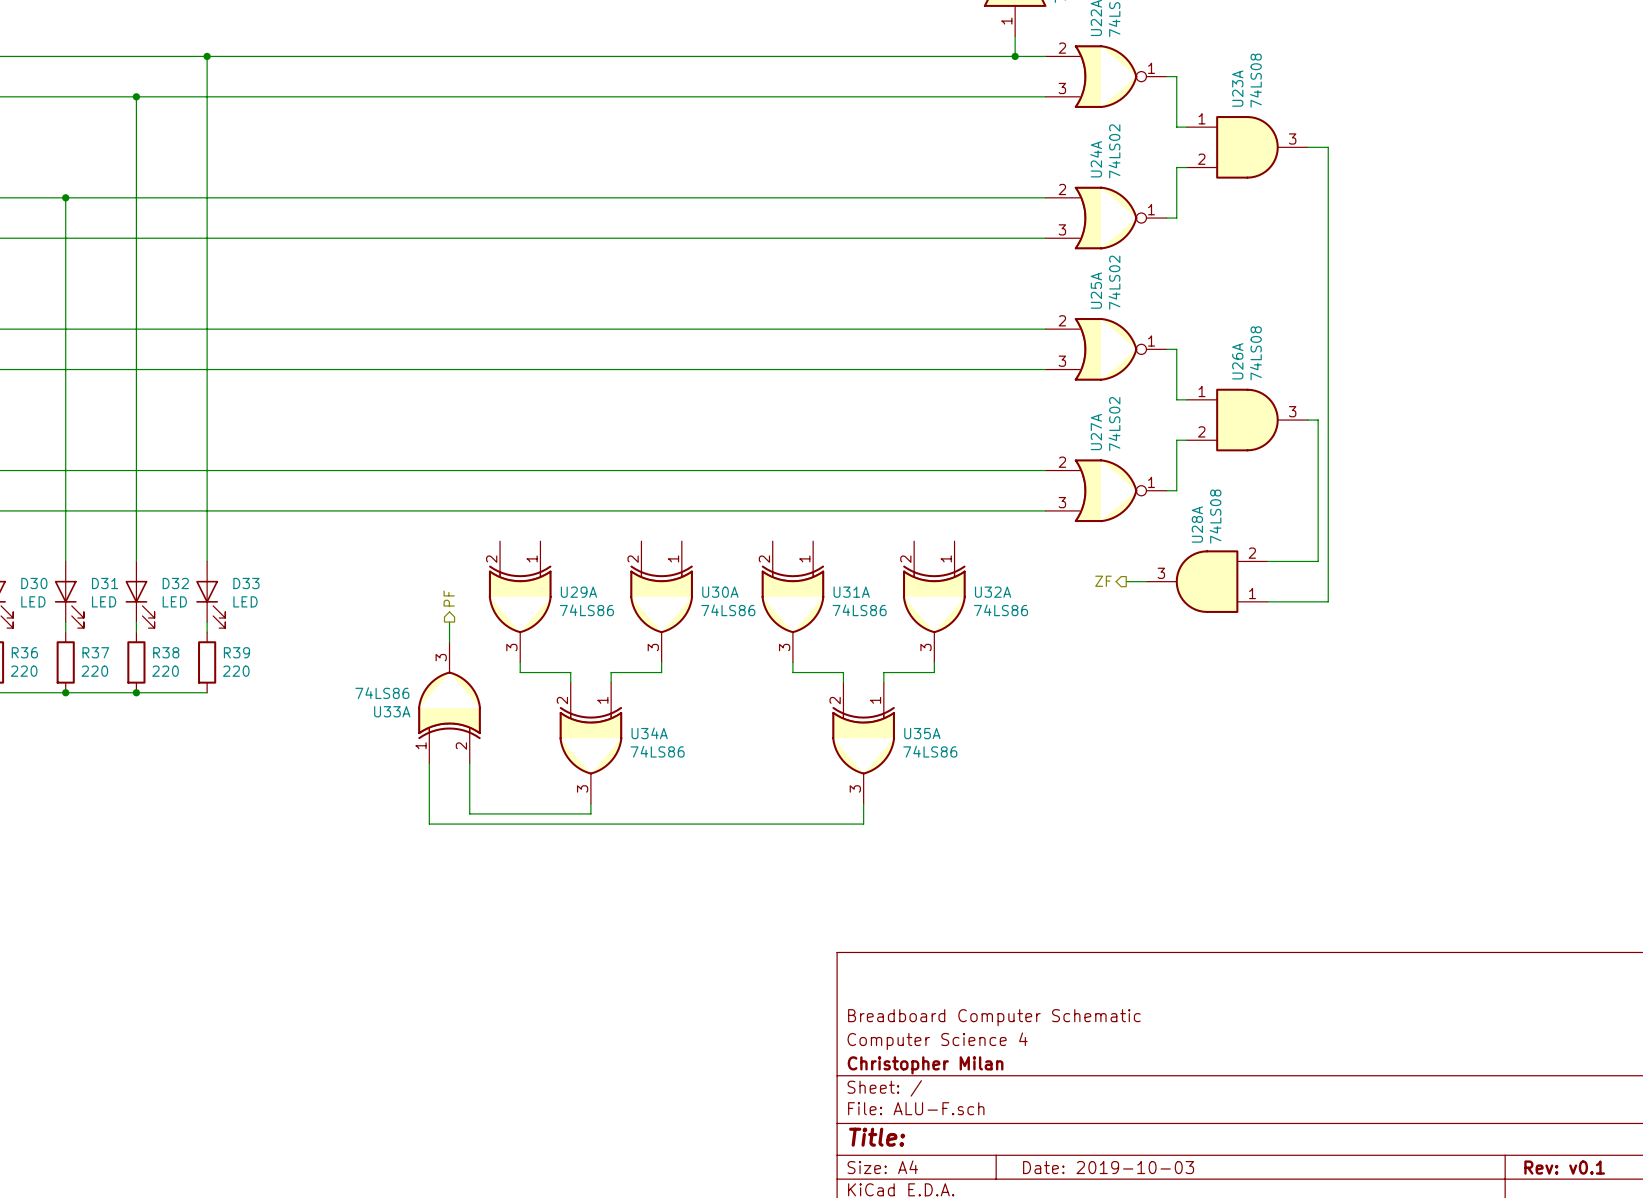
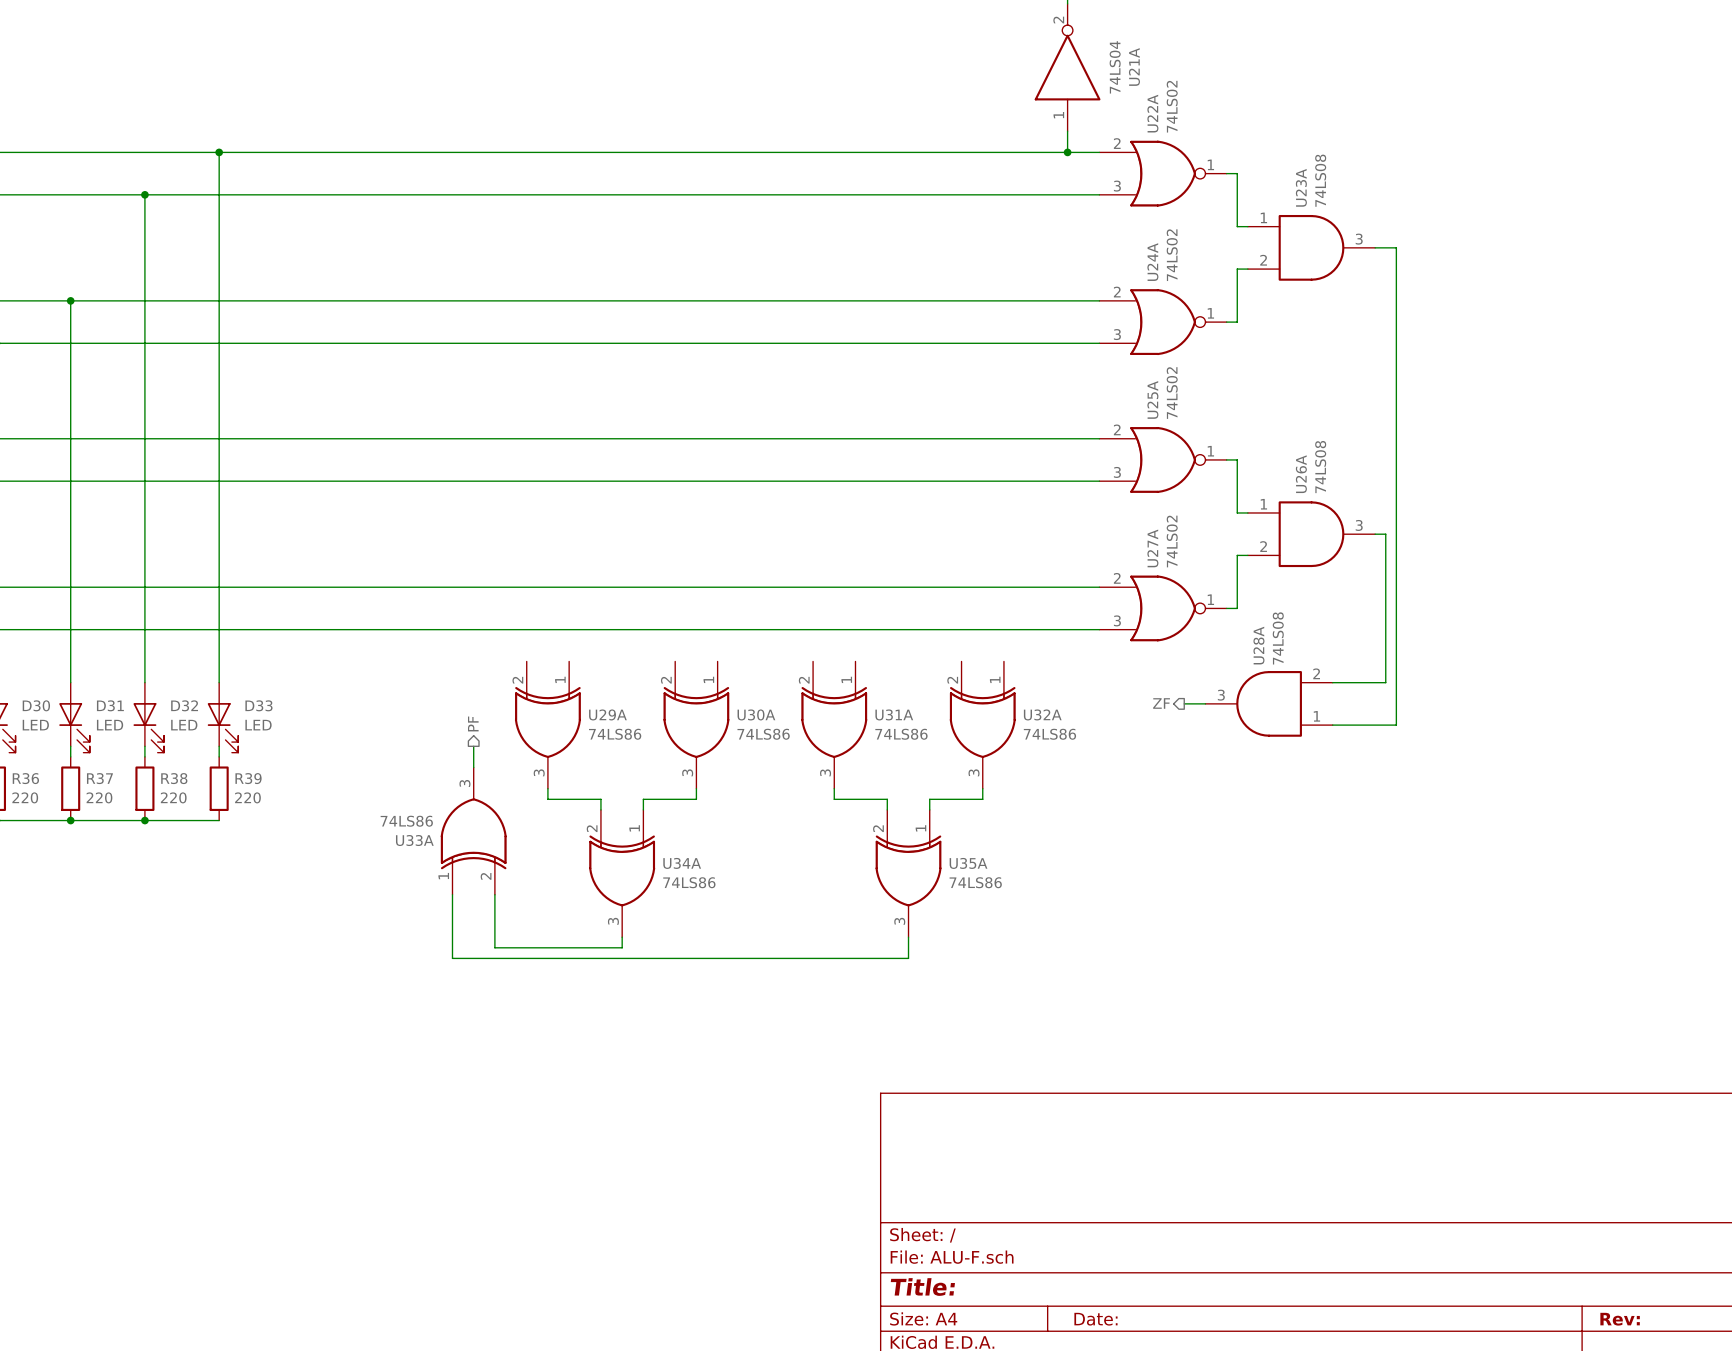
title block: Breadboard Computer Schematic (994, 1017) -> none
title block: Computer Science 4 (937, 1041) -> none
title block: Christopher Milan (925, 1065) -> none
title block: Date: 2019-10-03 (1108, 1167) -> Date: (1095, 1319)
title block: Rev: v0.1 (1564, 1167) -> Rev: (1620, 1319)

